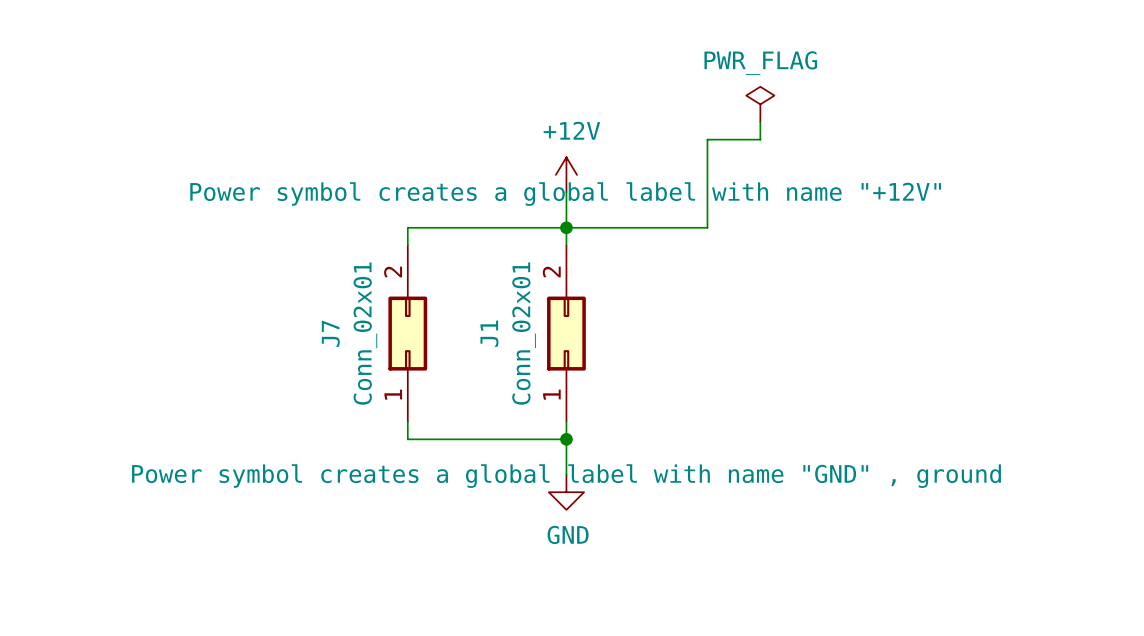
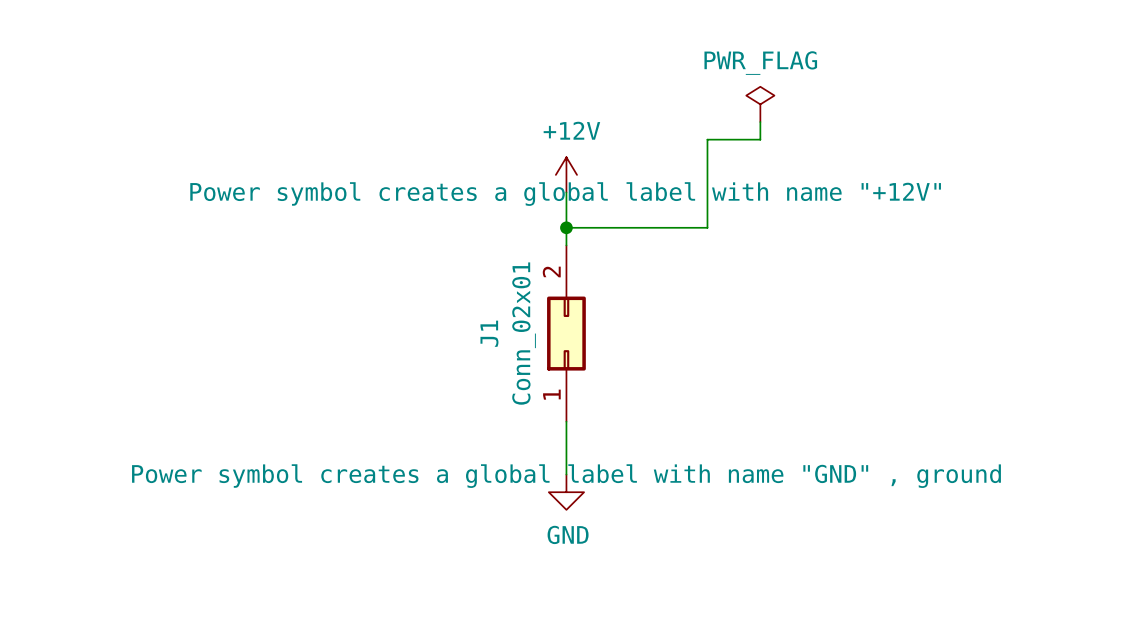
wire: (566, 227) (407, 227) (407, 245) -> none
J7: Conn_02x01 (407, 333) -> none
wire: (407, 421) (407, 439) (566, 439) -> none
junction: (566, 439) -> none

